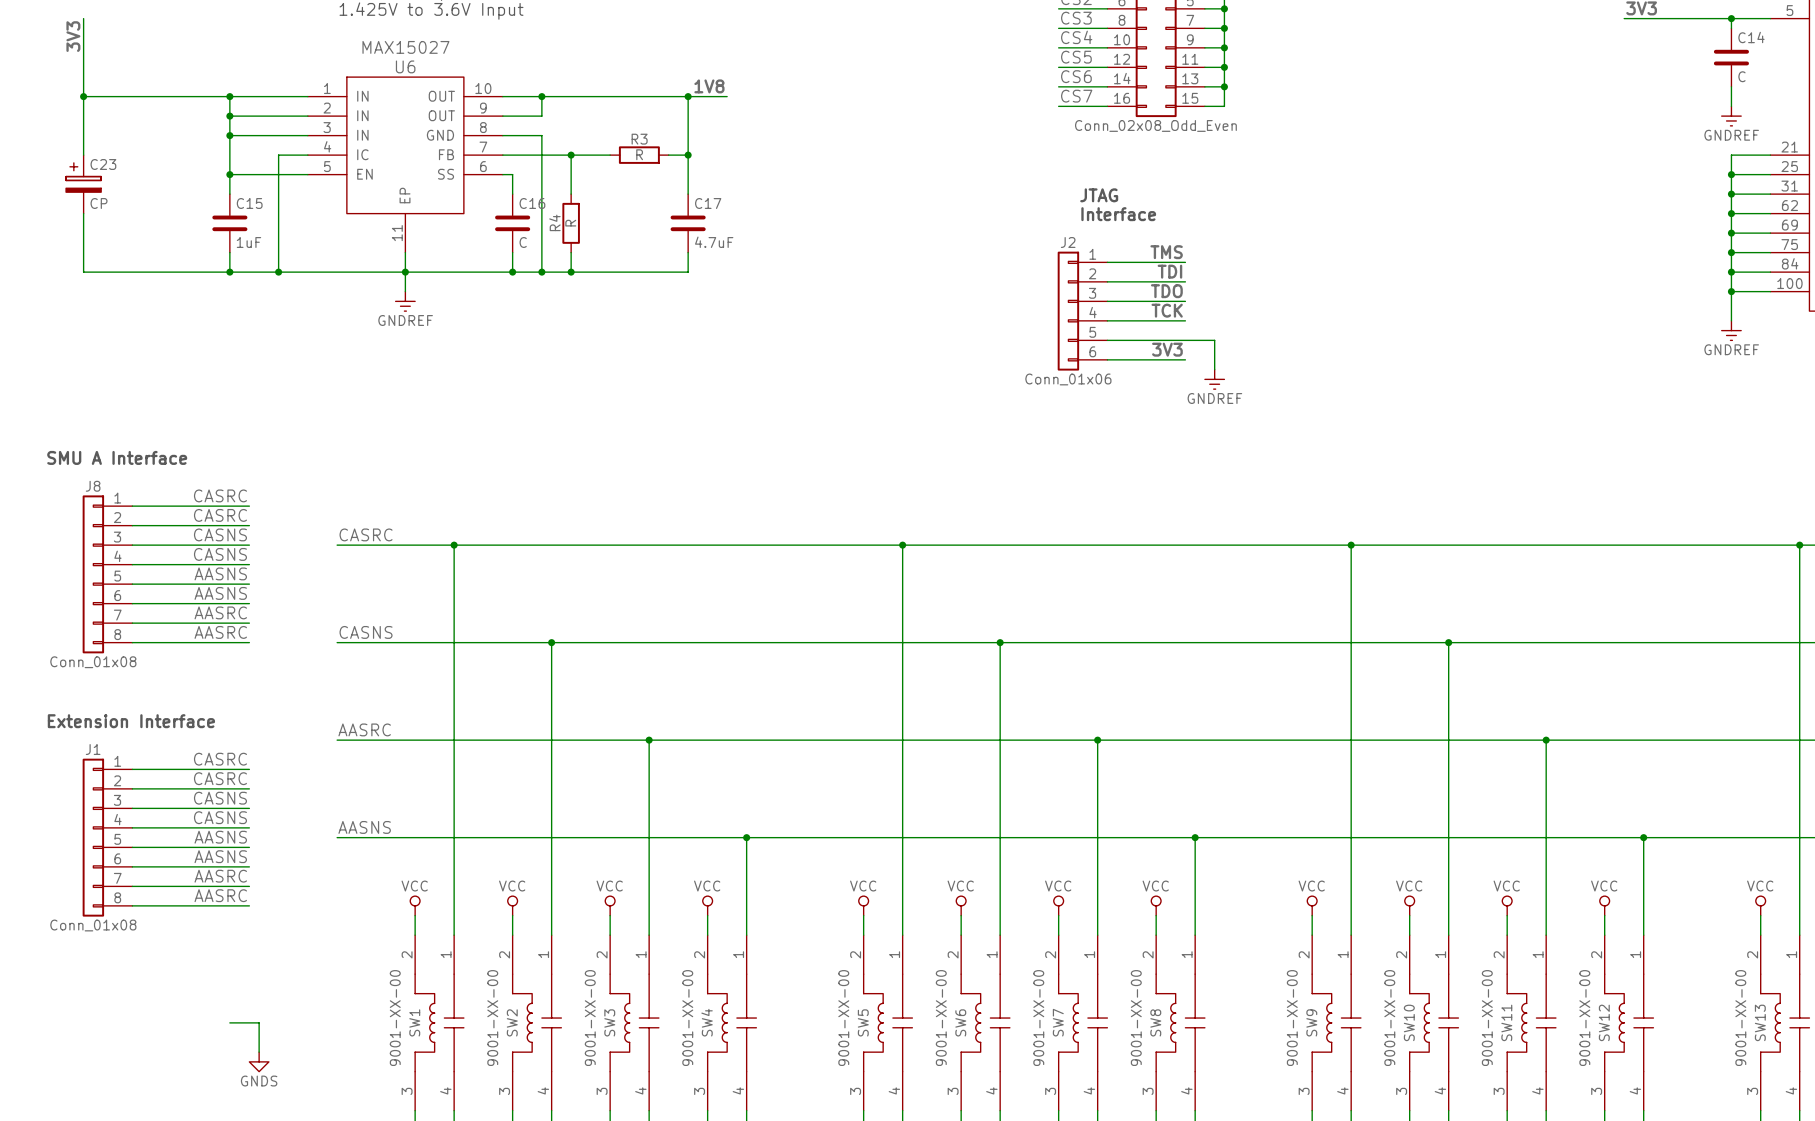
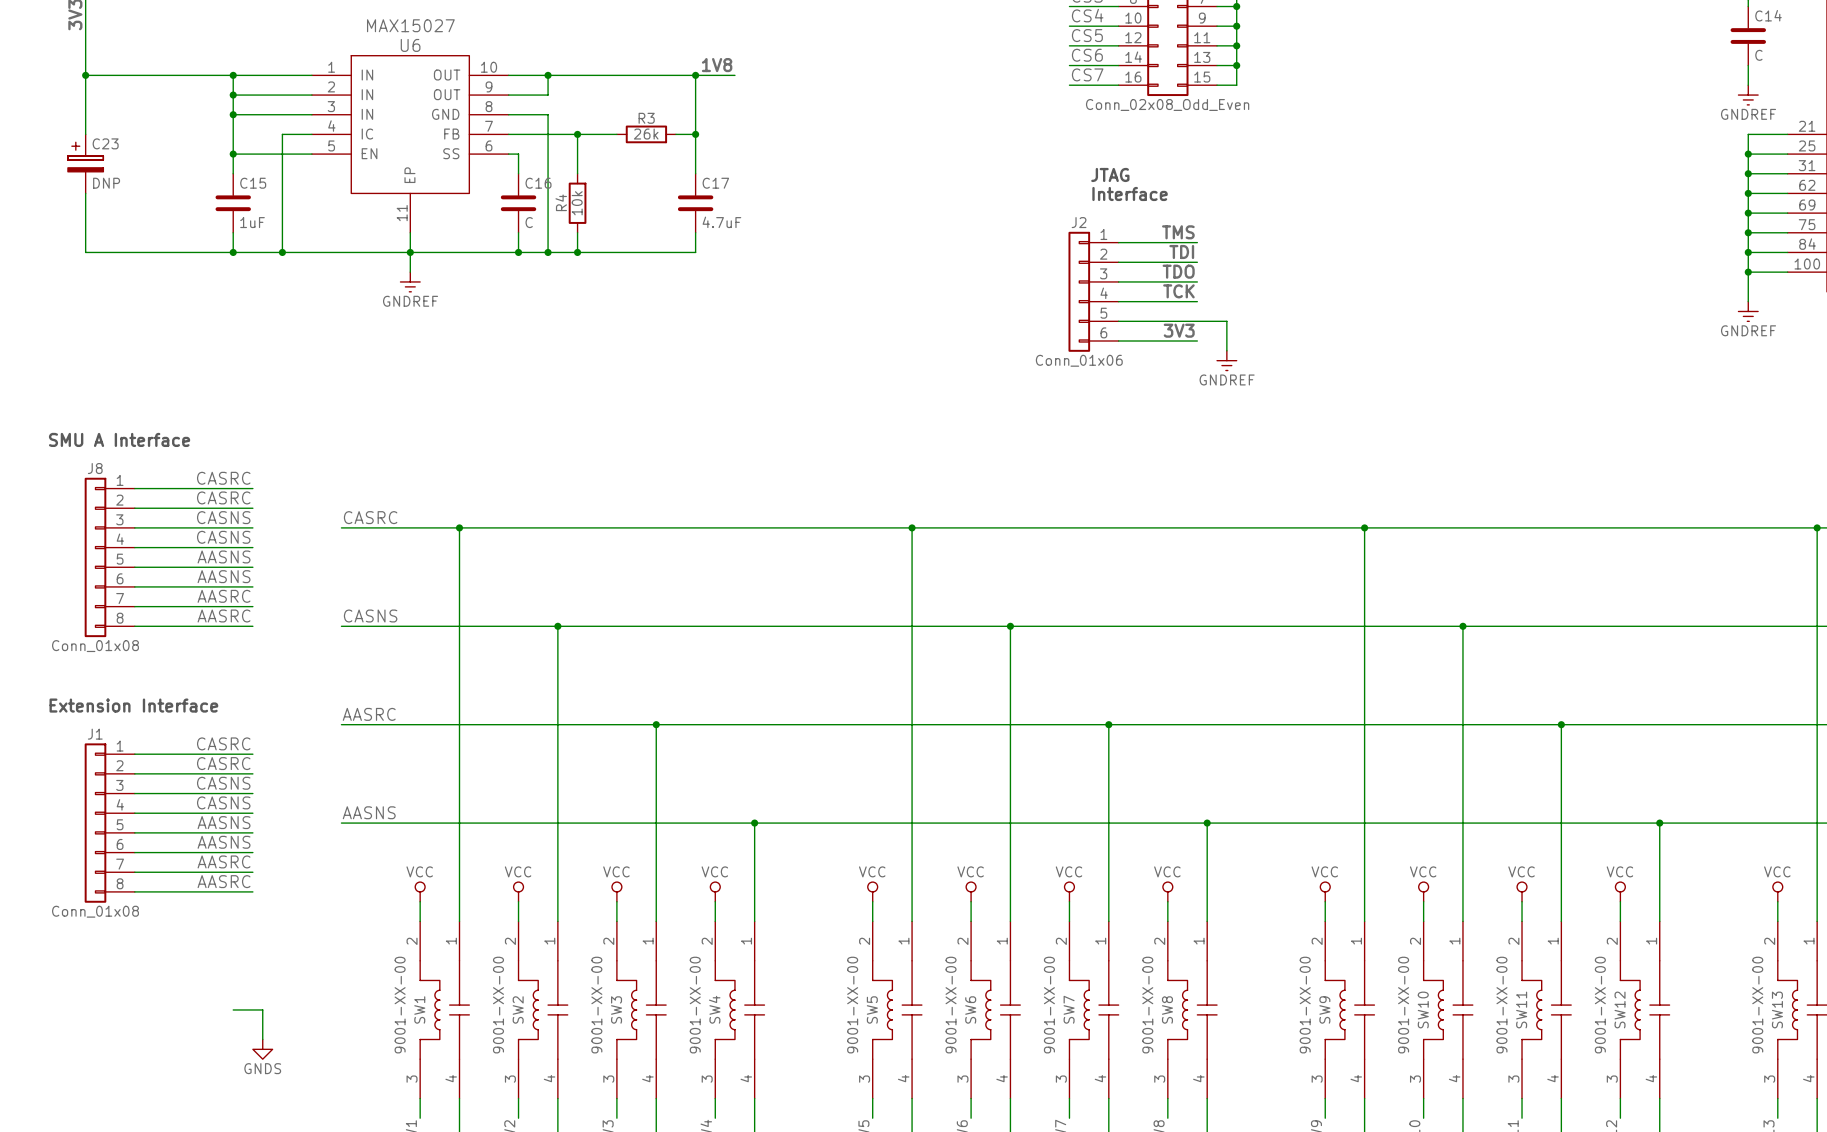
R3 value: R (639, 154) -> 26k (646, 134)
C23 value: CP (99, 203) -> DNP (106, 183)
R4 value: R (570, 223) -> 10k (577, 203)

